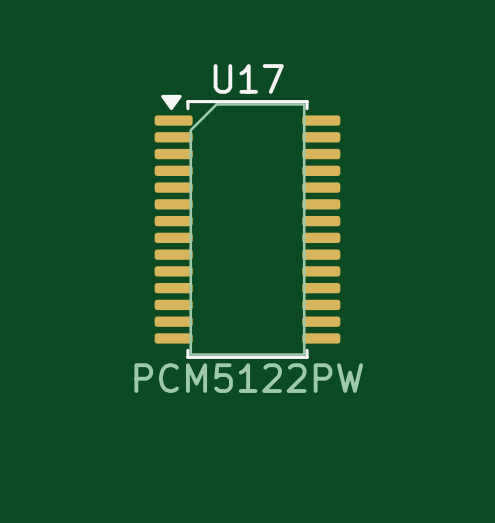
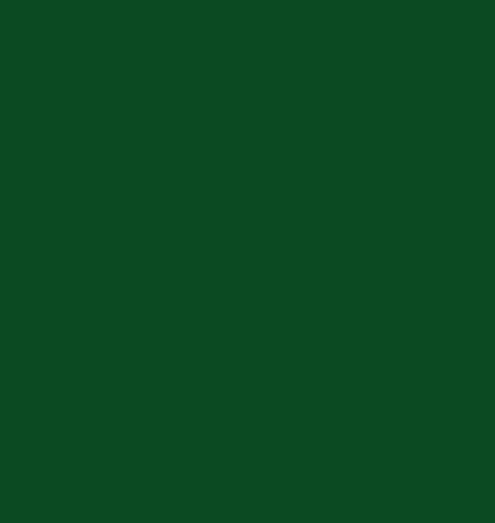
U17: PCM5122PW (247, 226) -> none

